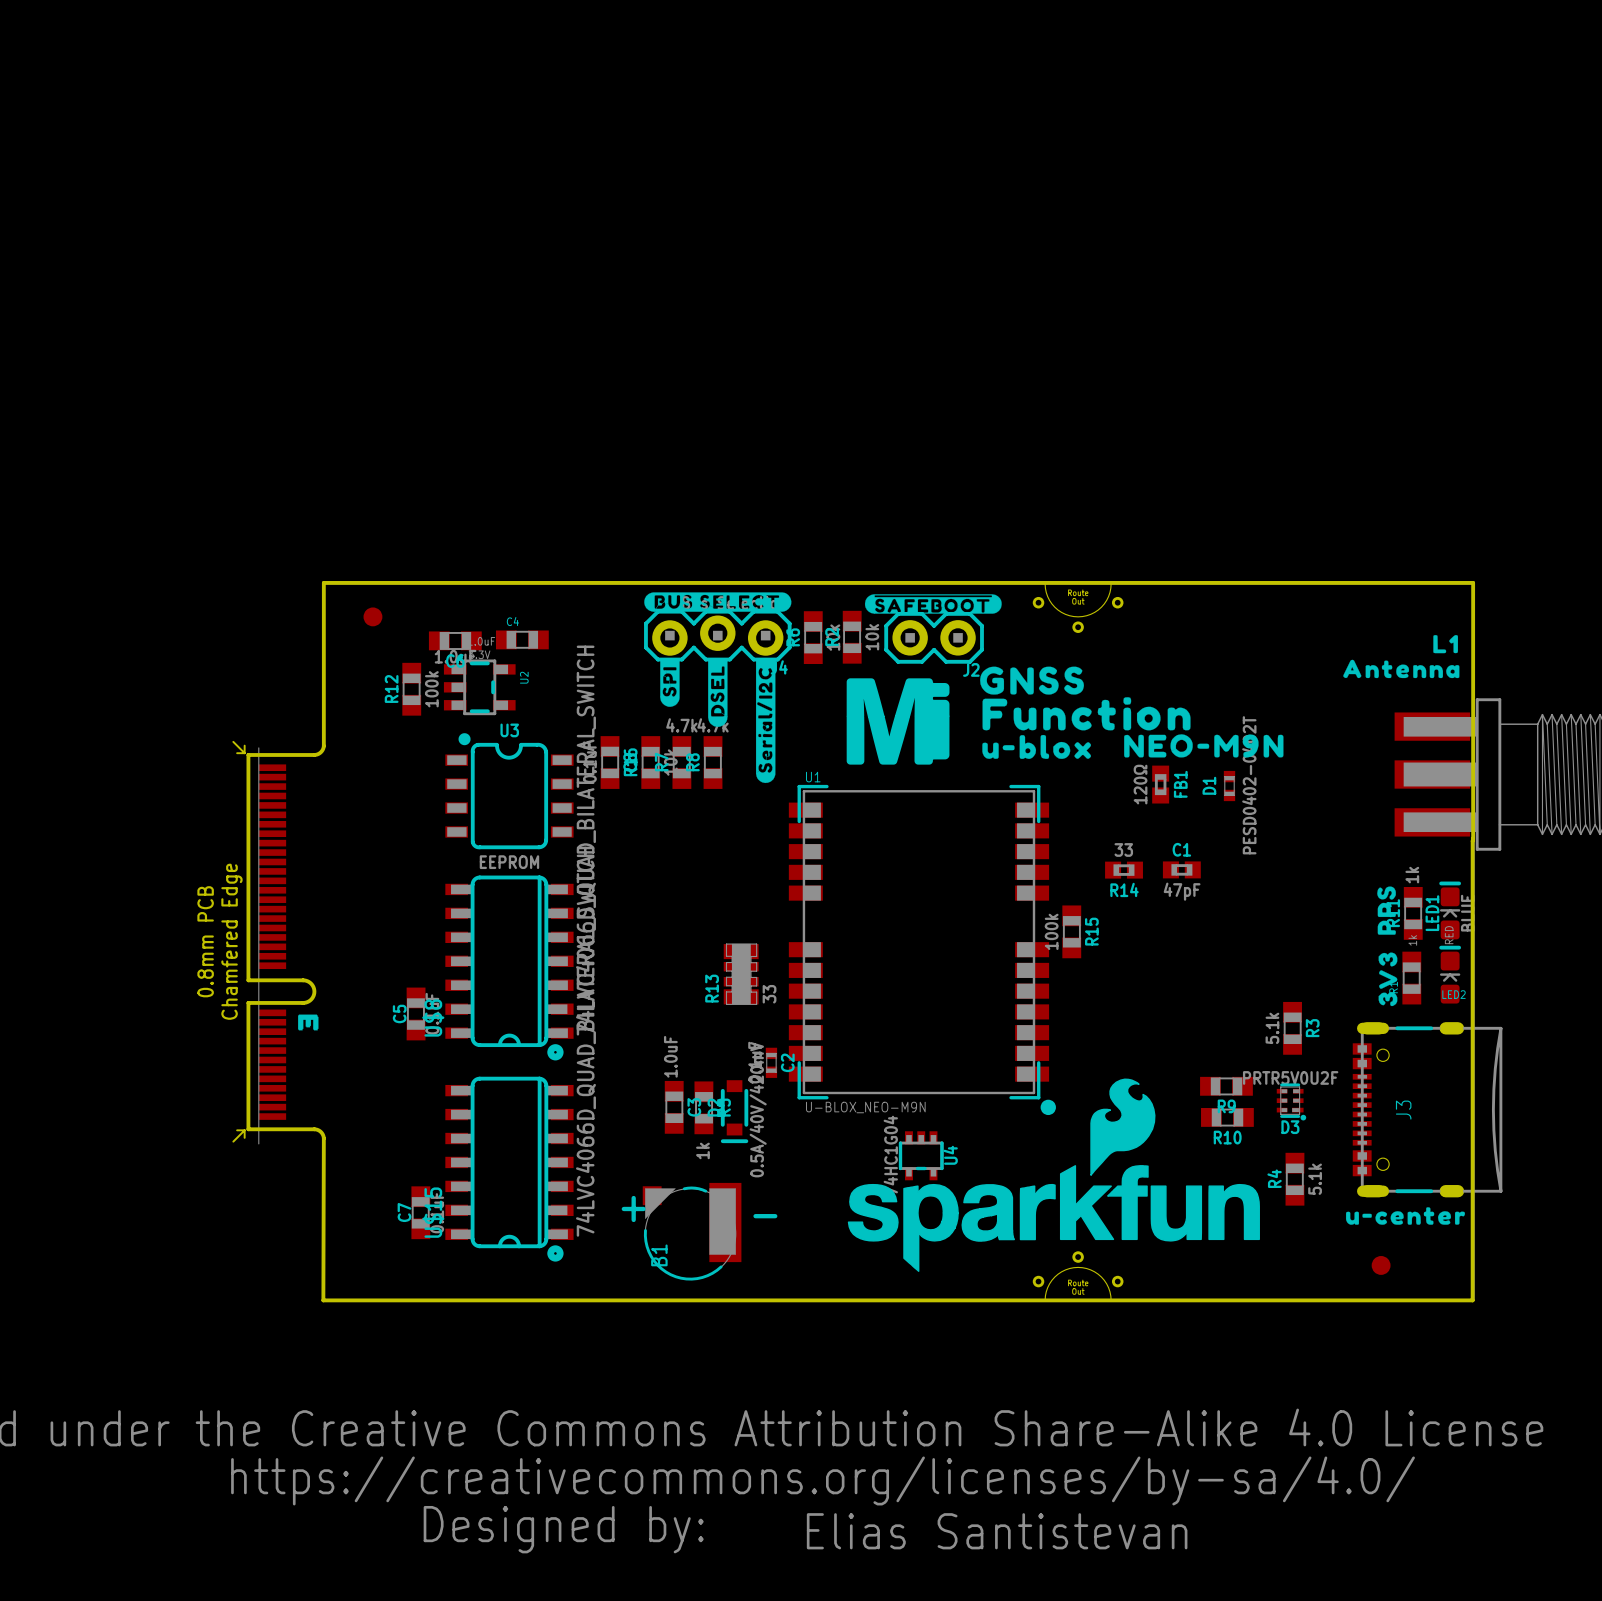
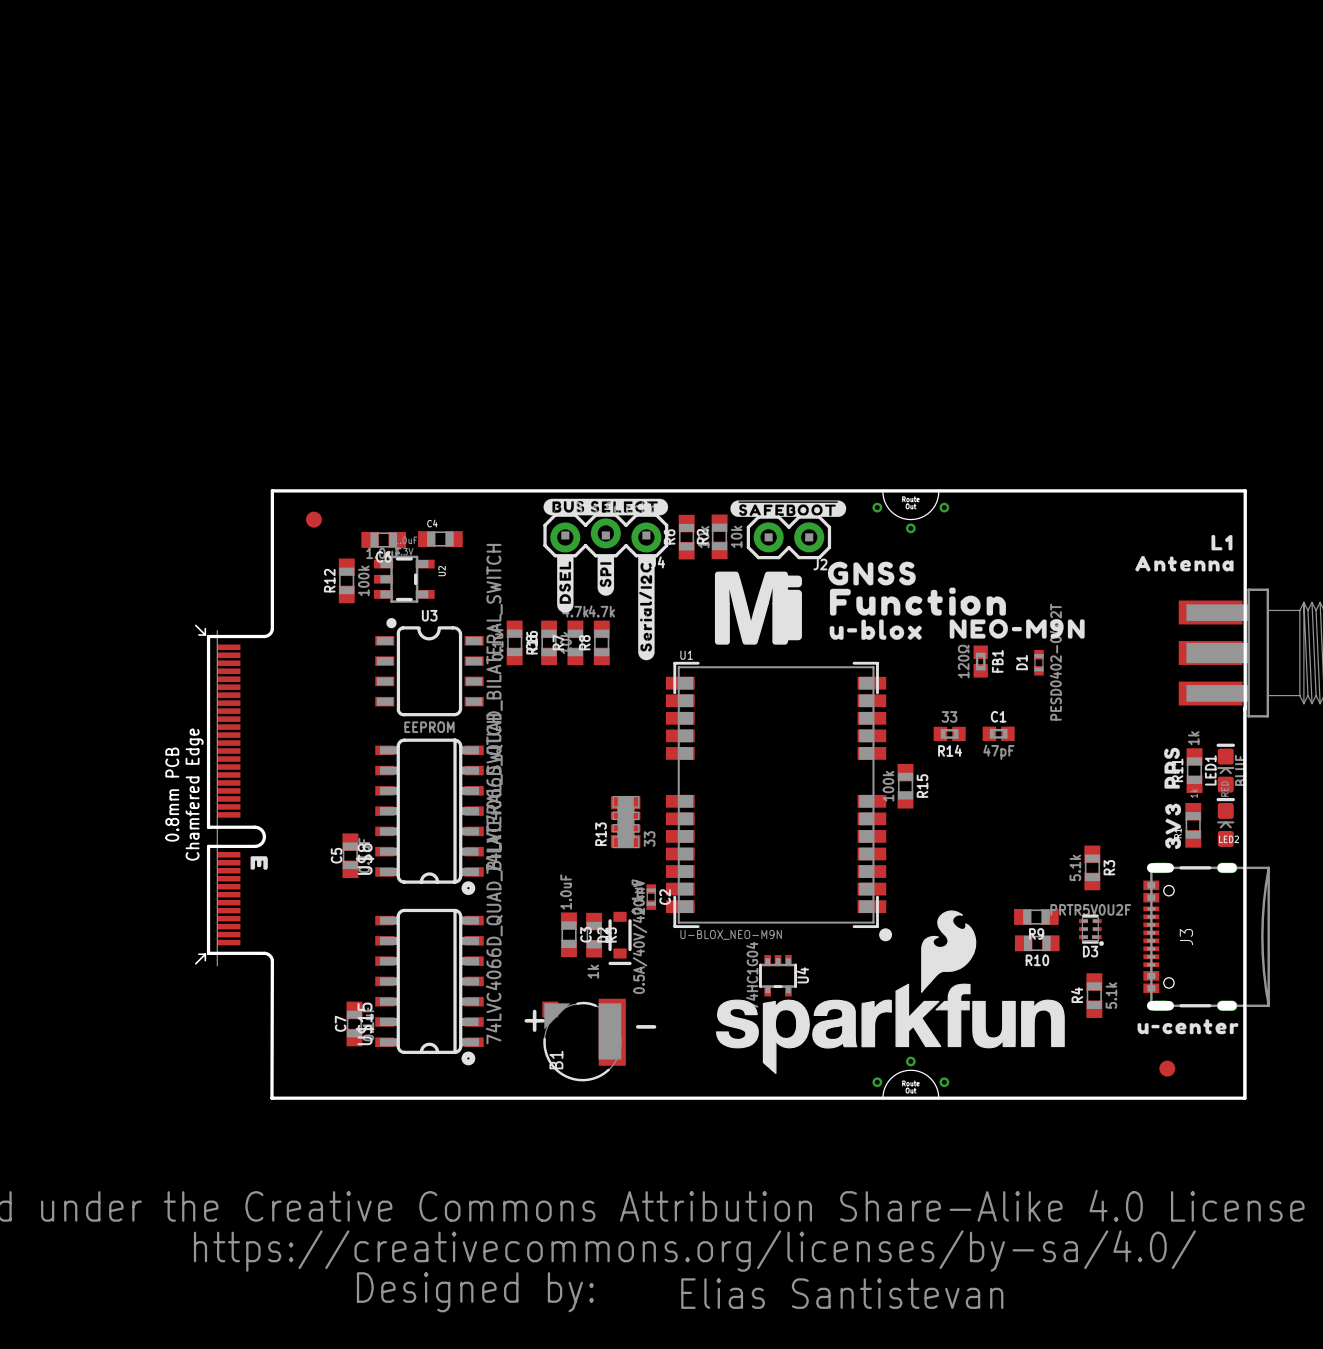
drawing position: (669, 683) -> (605, 576)
drawing position: (717, 693) -> (565, 584)

